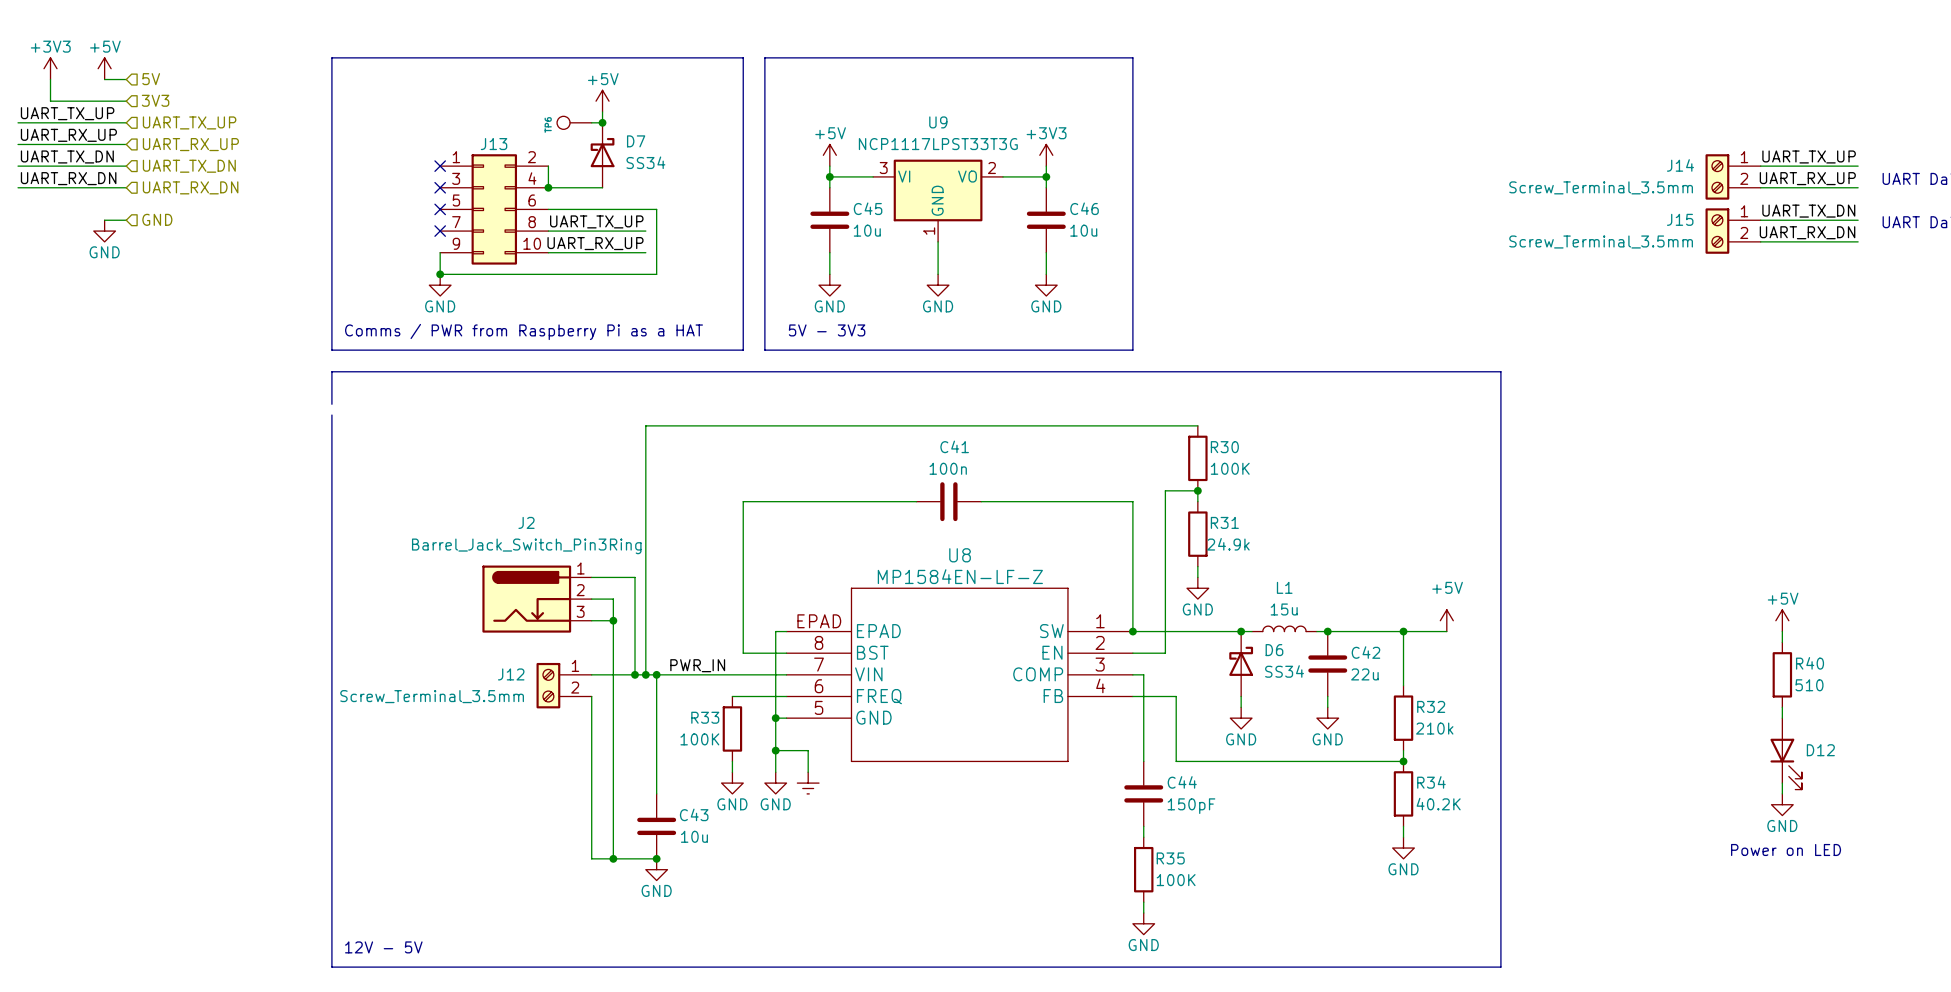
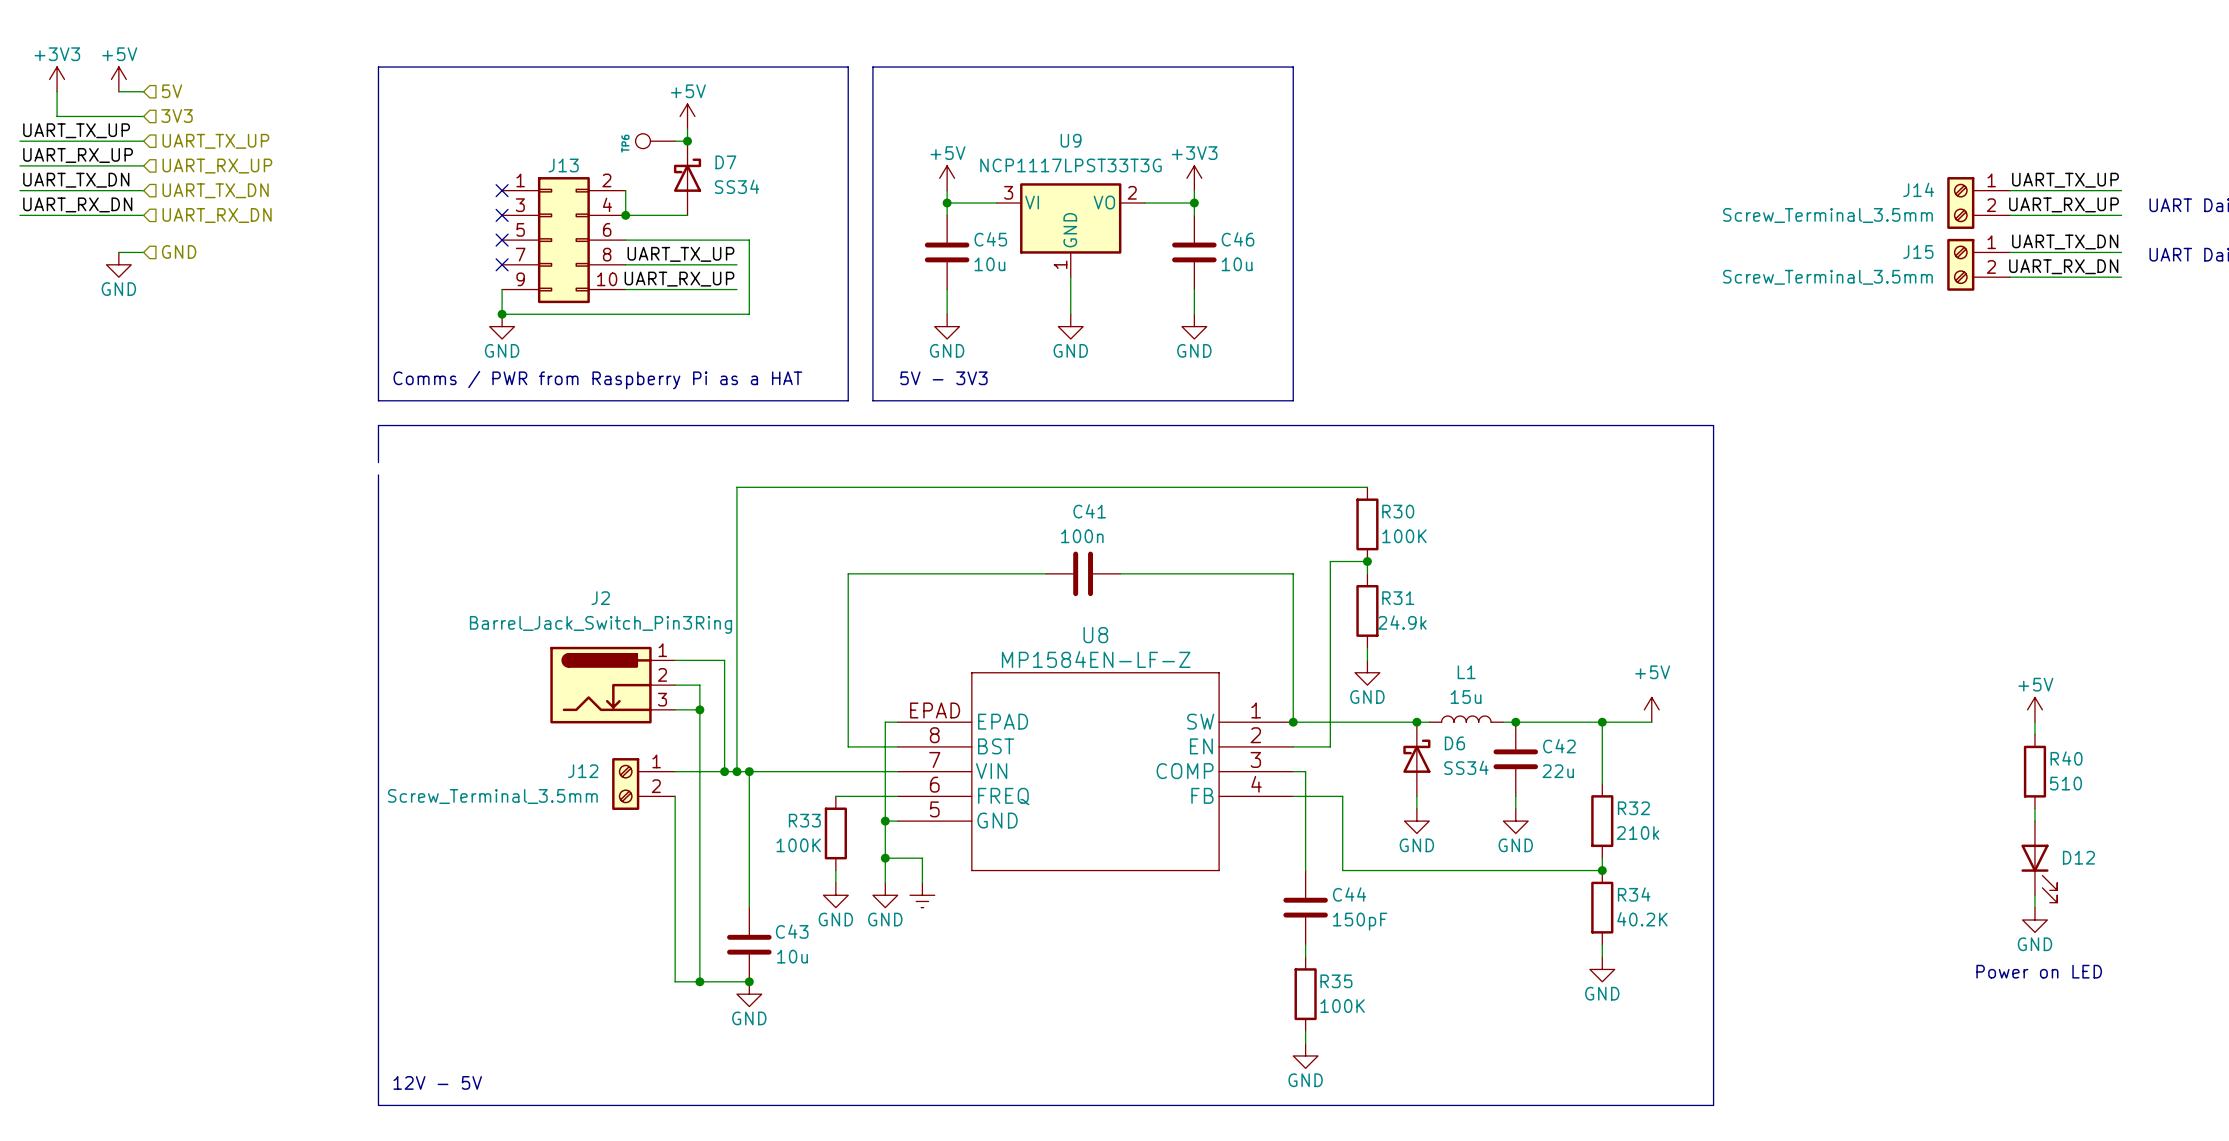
label: PWR_IN (697, 665) -> none

